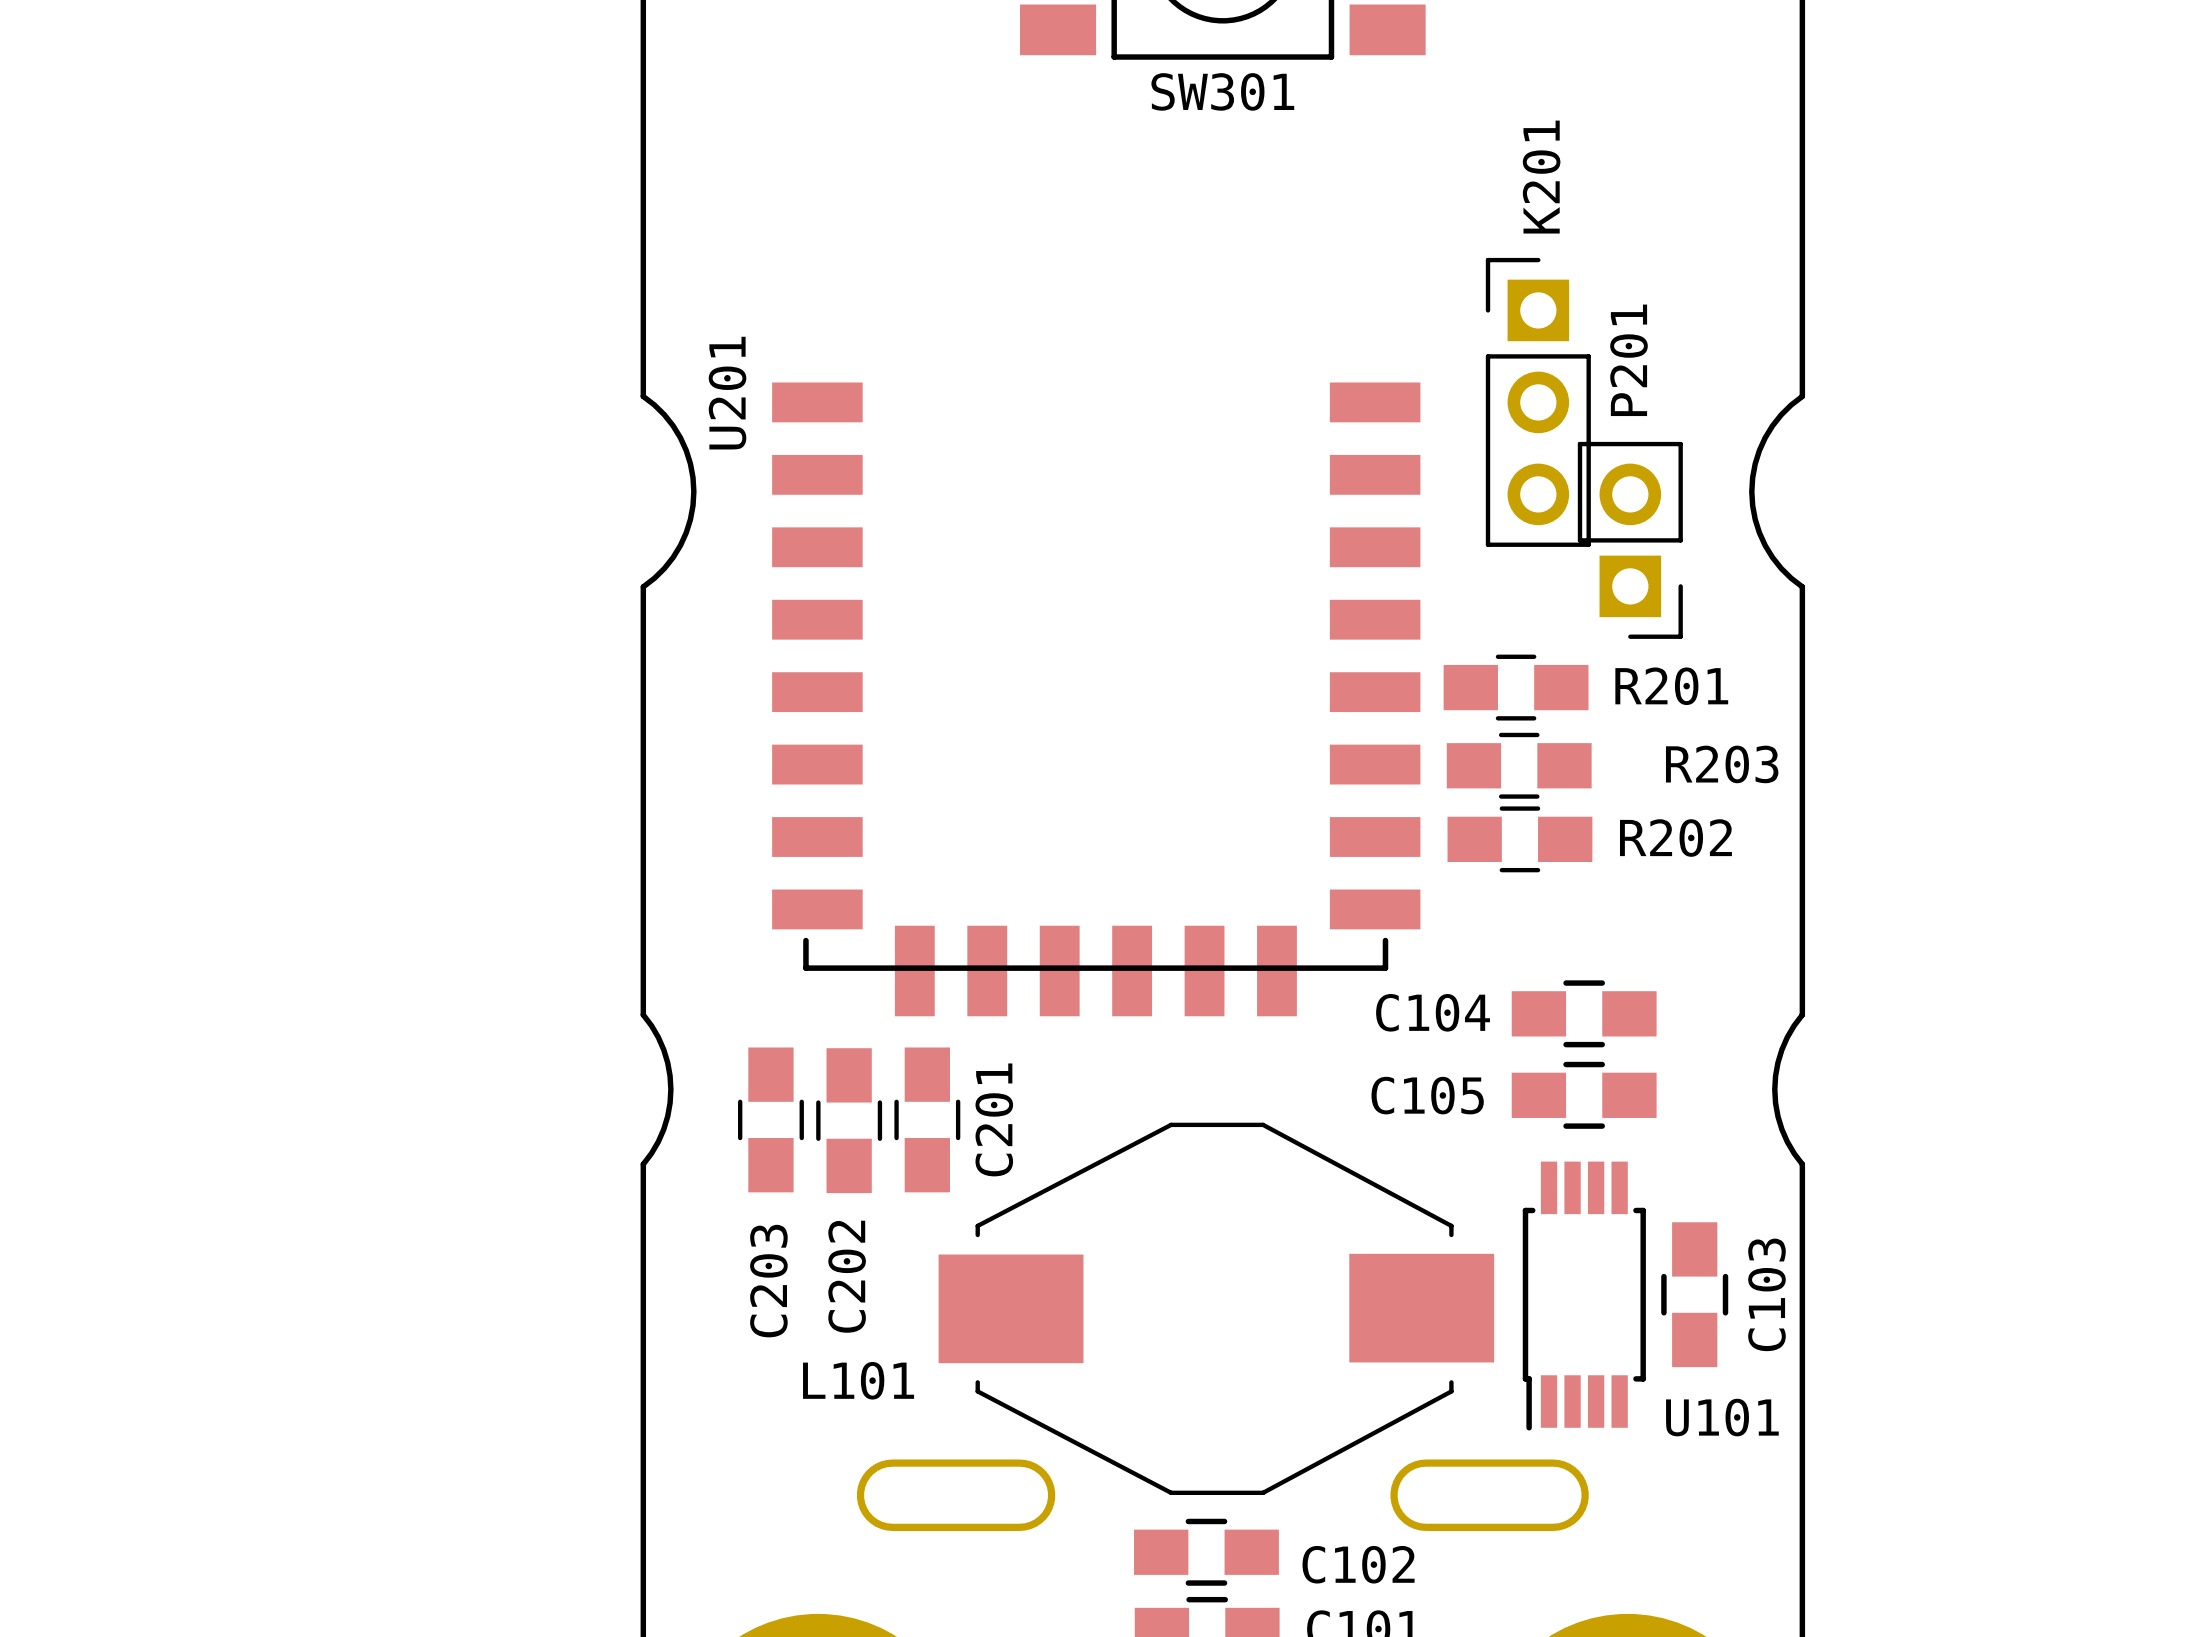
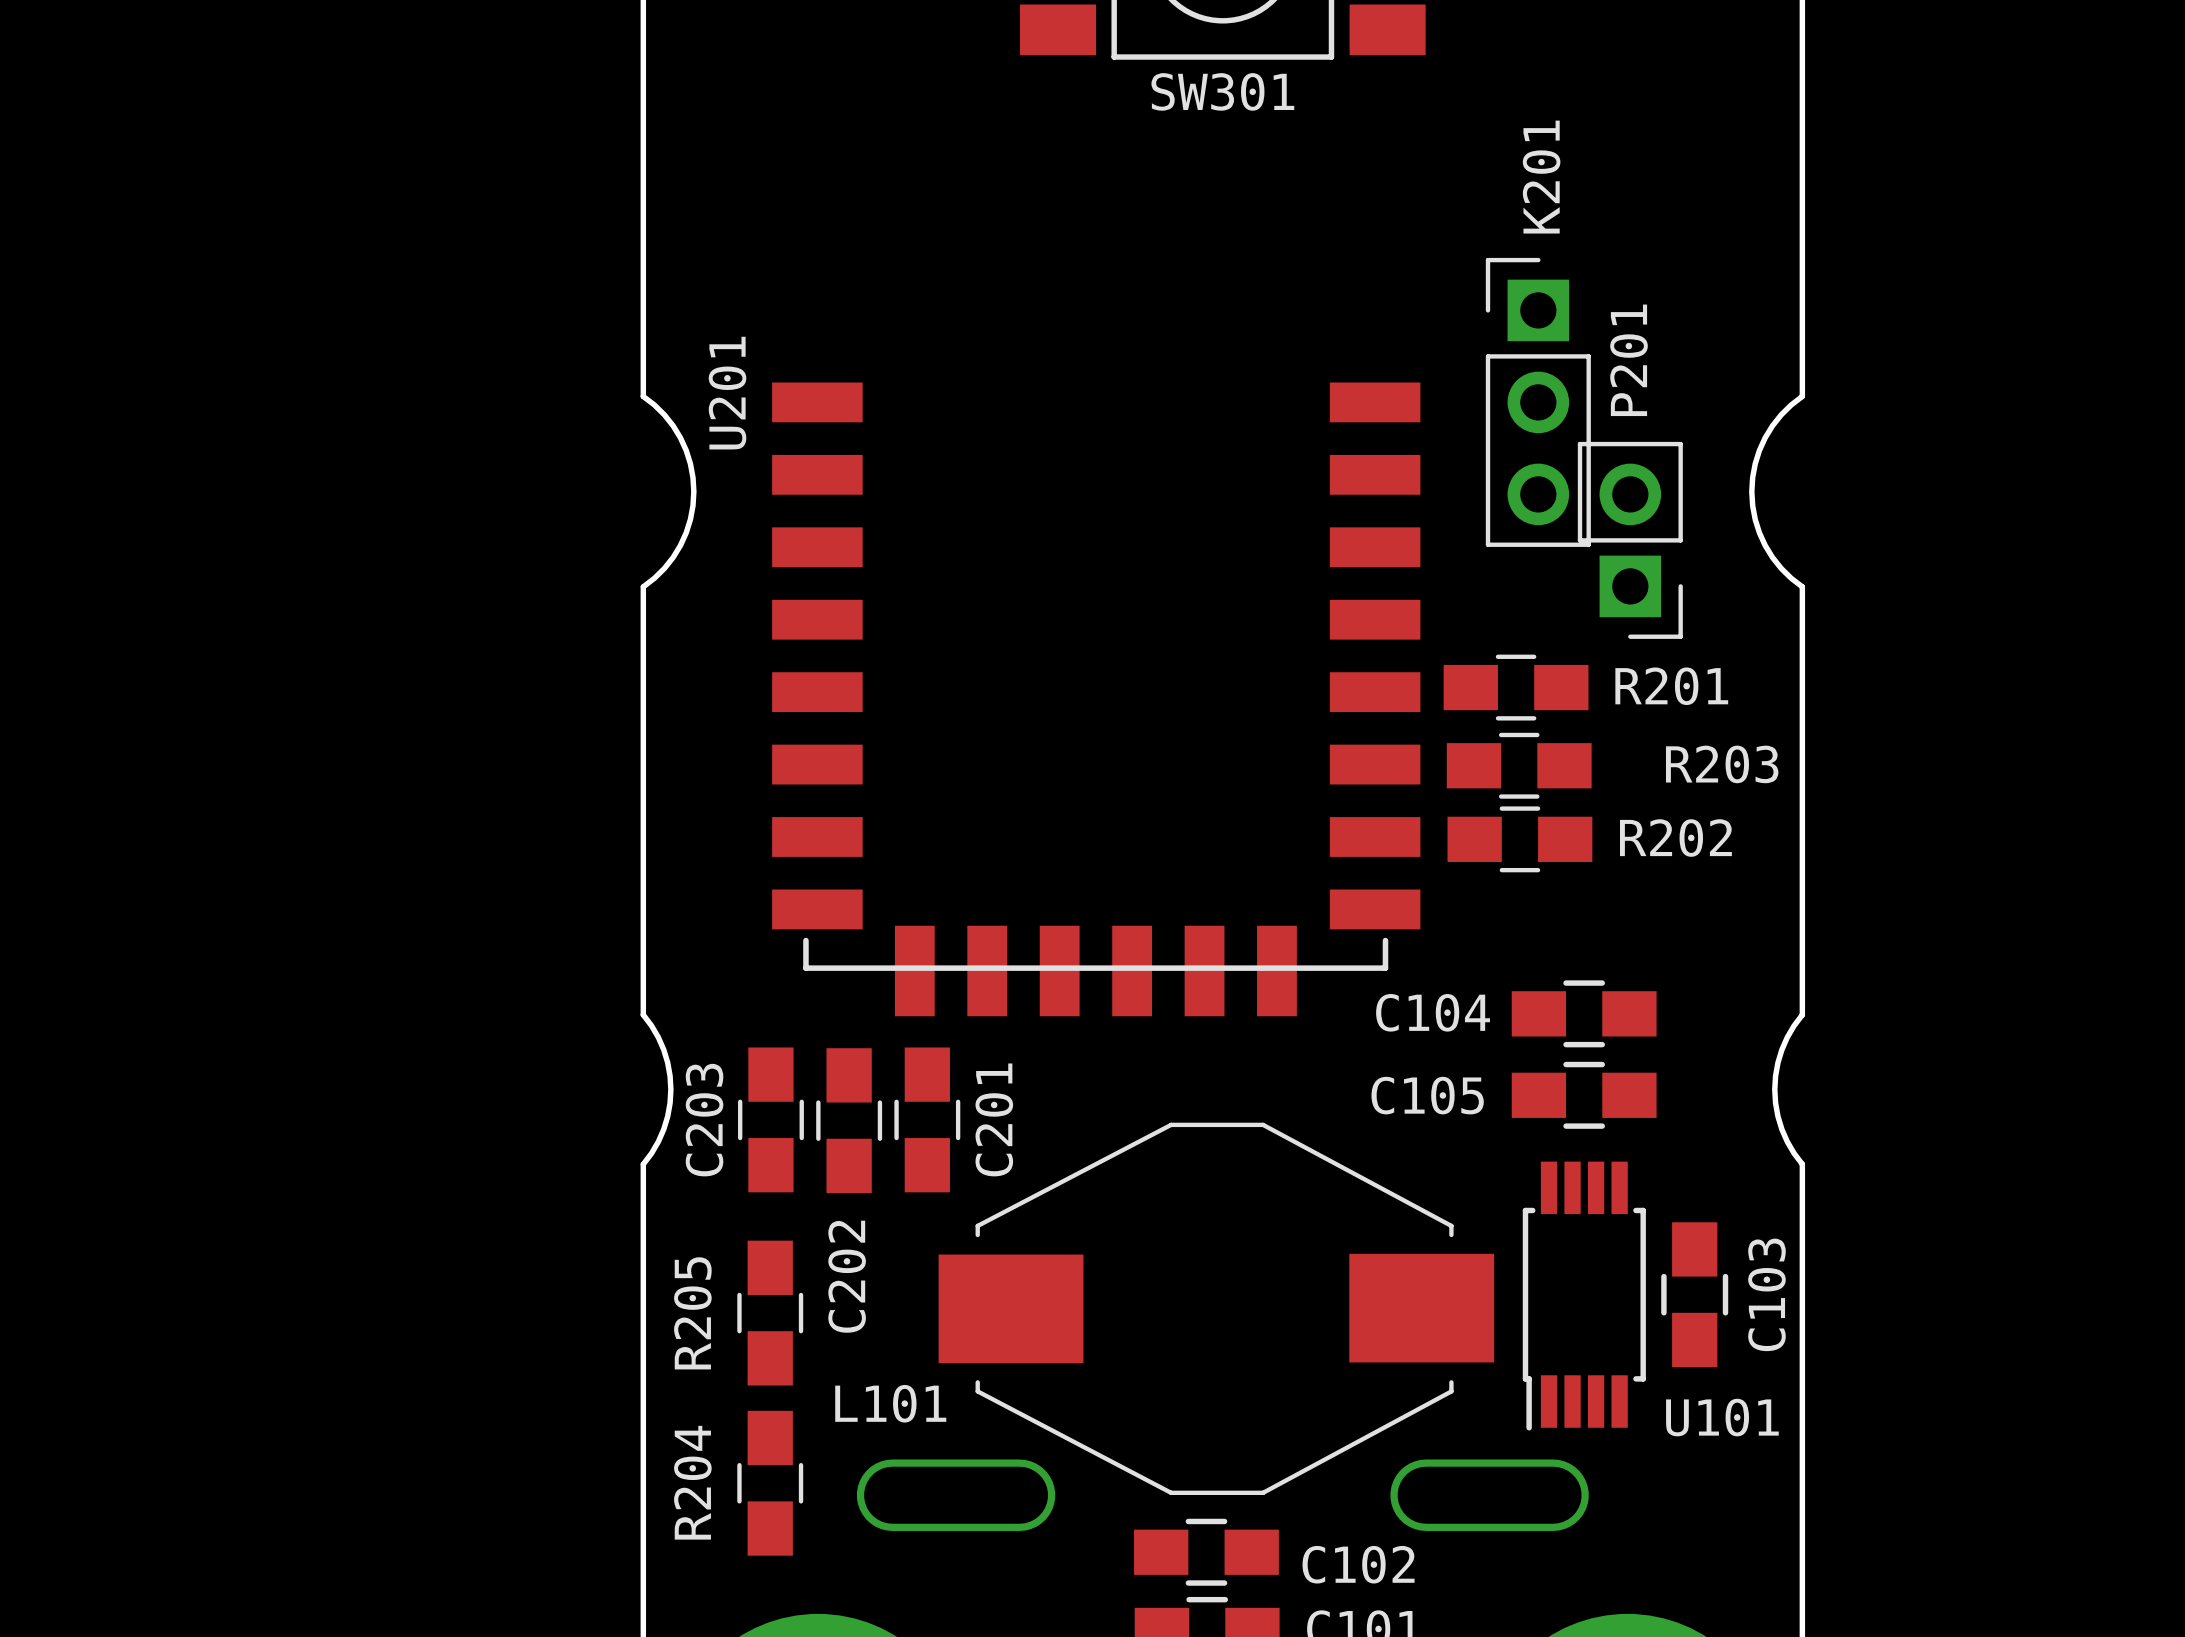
C203 name position: C203 (768, 1281) -> C203 (704, 1120)
R205: none -> (770, 1313)
L101 name position: L101 (858, 1380) -> L101 (890, 1403)
R204: none -> (770, 1483)

